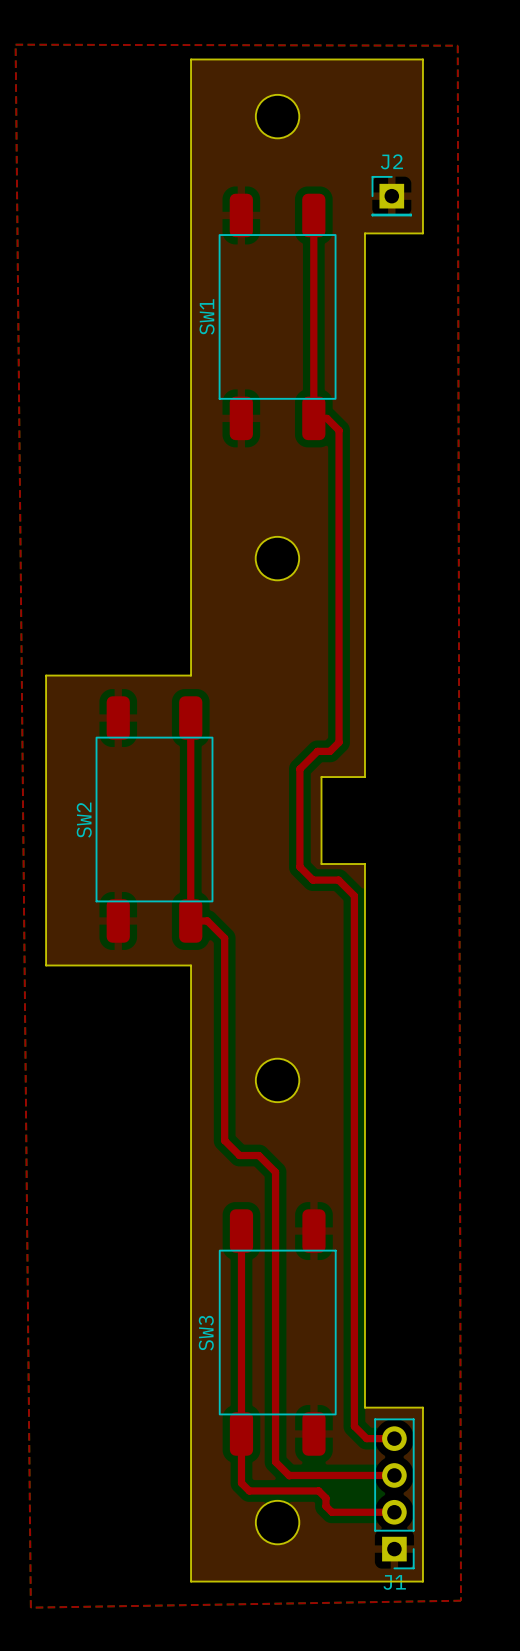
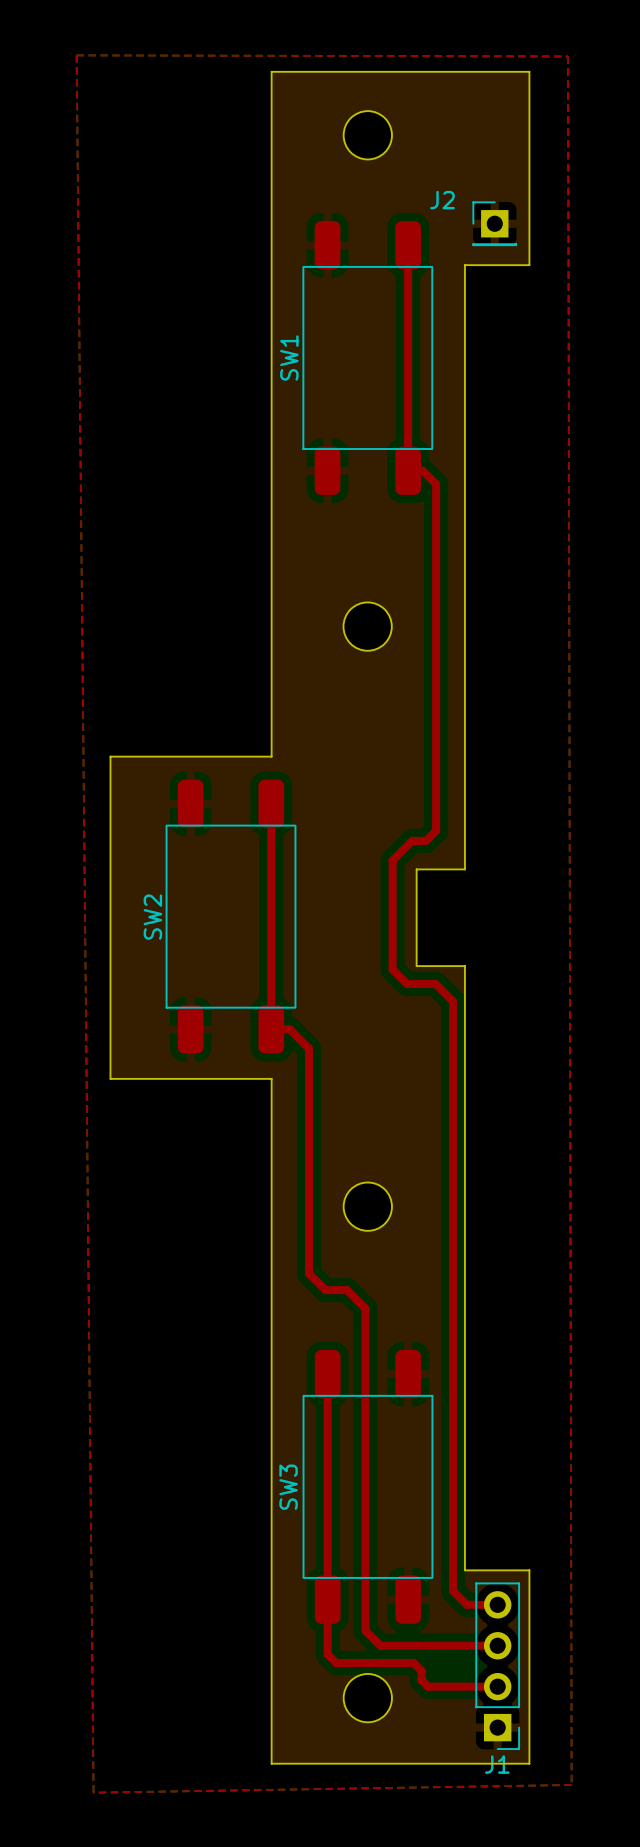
J2 name position: J2 (391, 161) -> J2 (442, 200)

